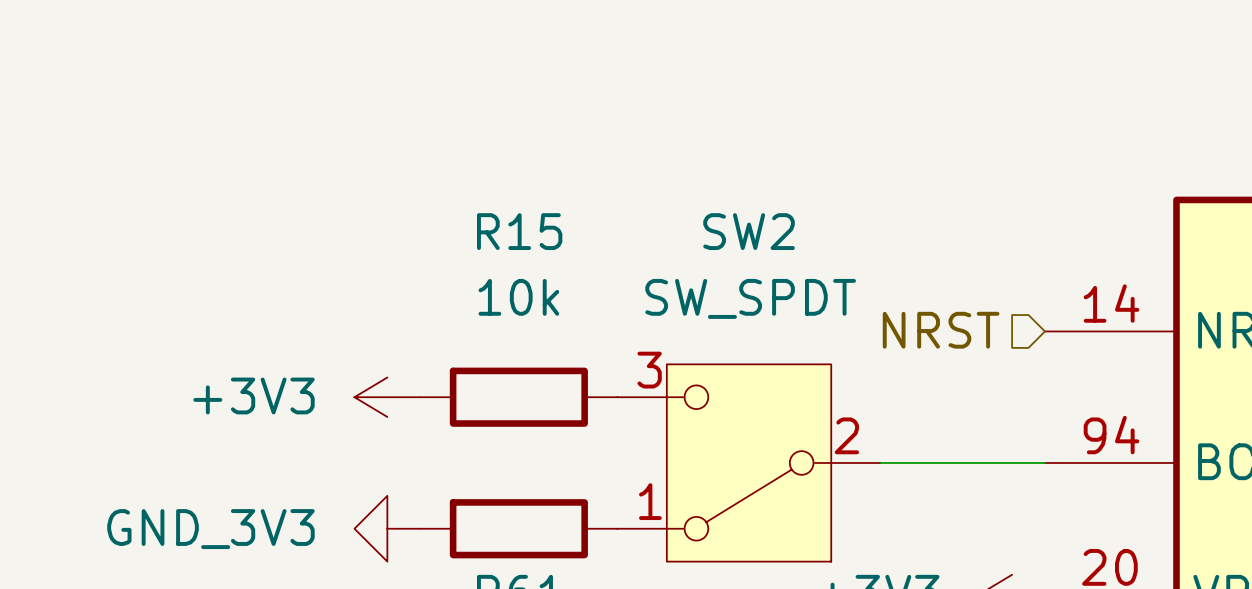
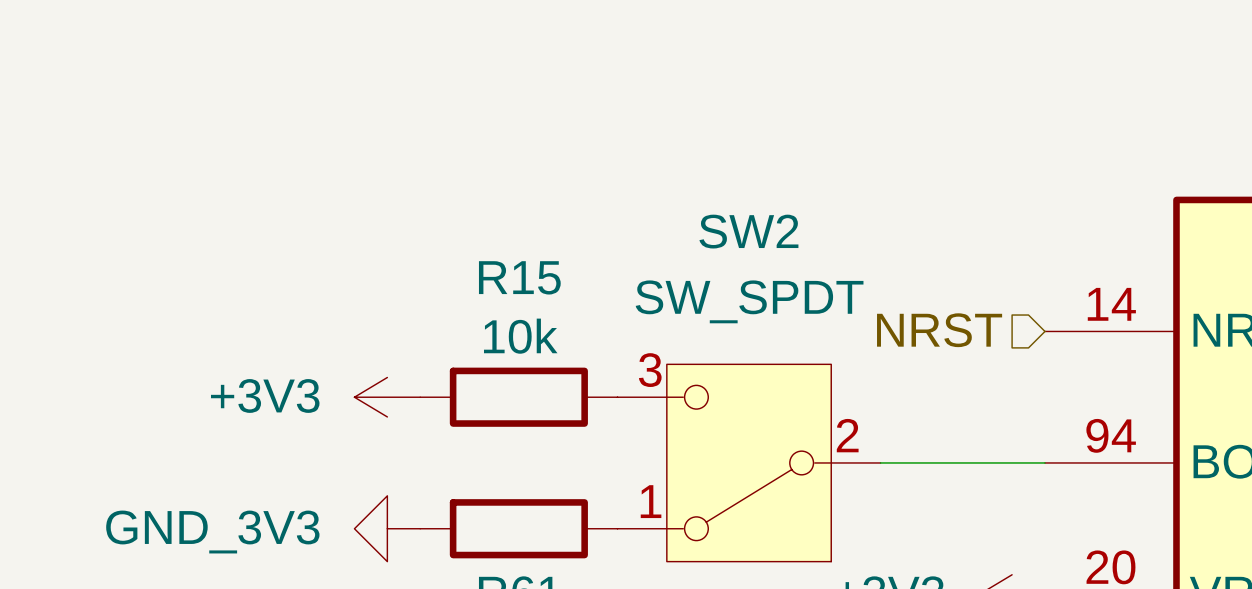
R15 name position: R15 (519, 231) -> R15 (519, 277)
R15 value position: 10k (518, 297) -> 10k (520, 336)

